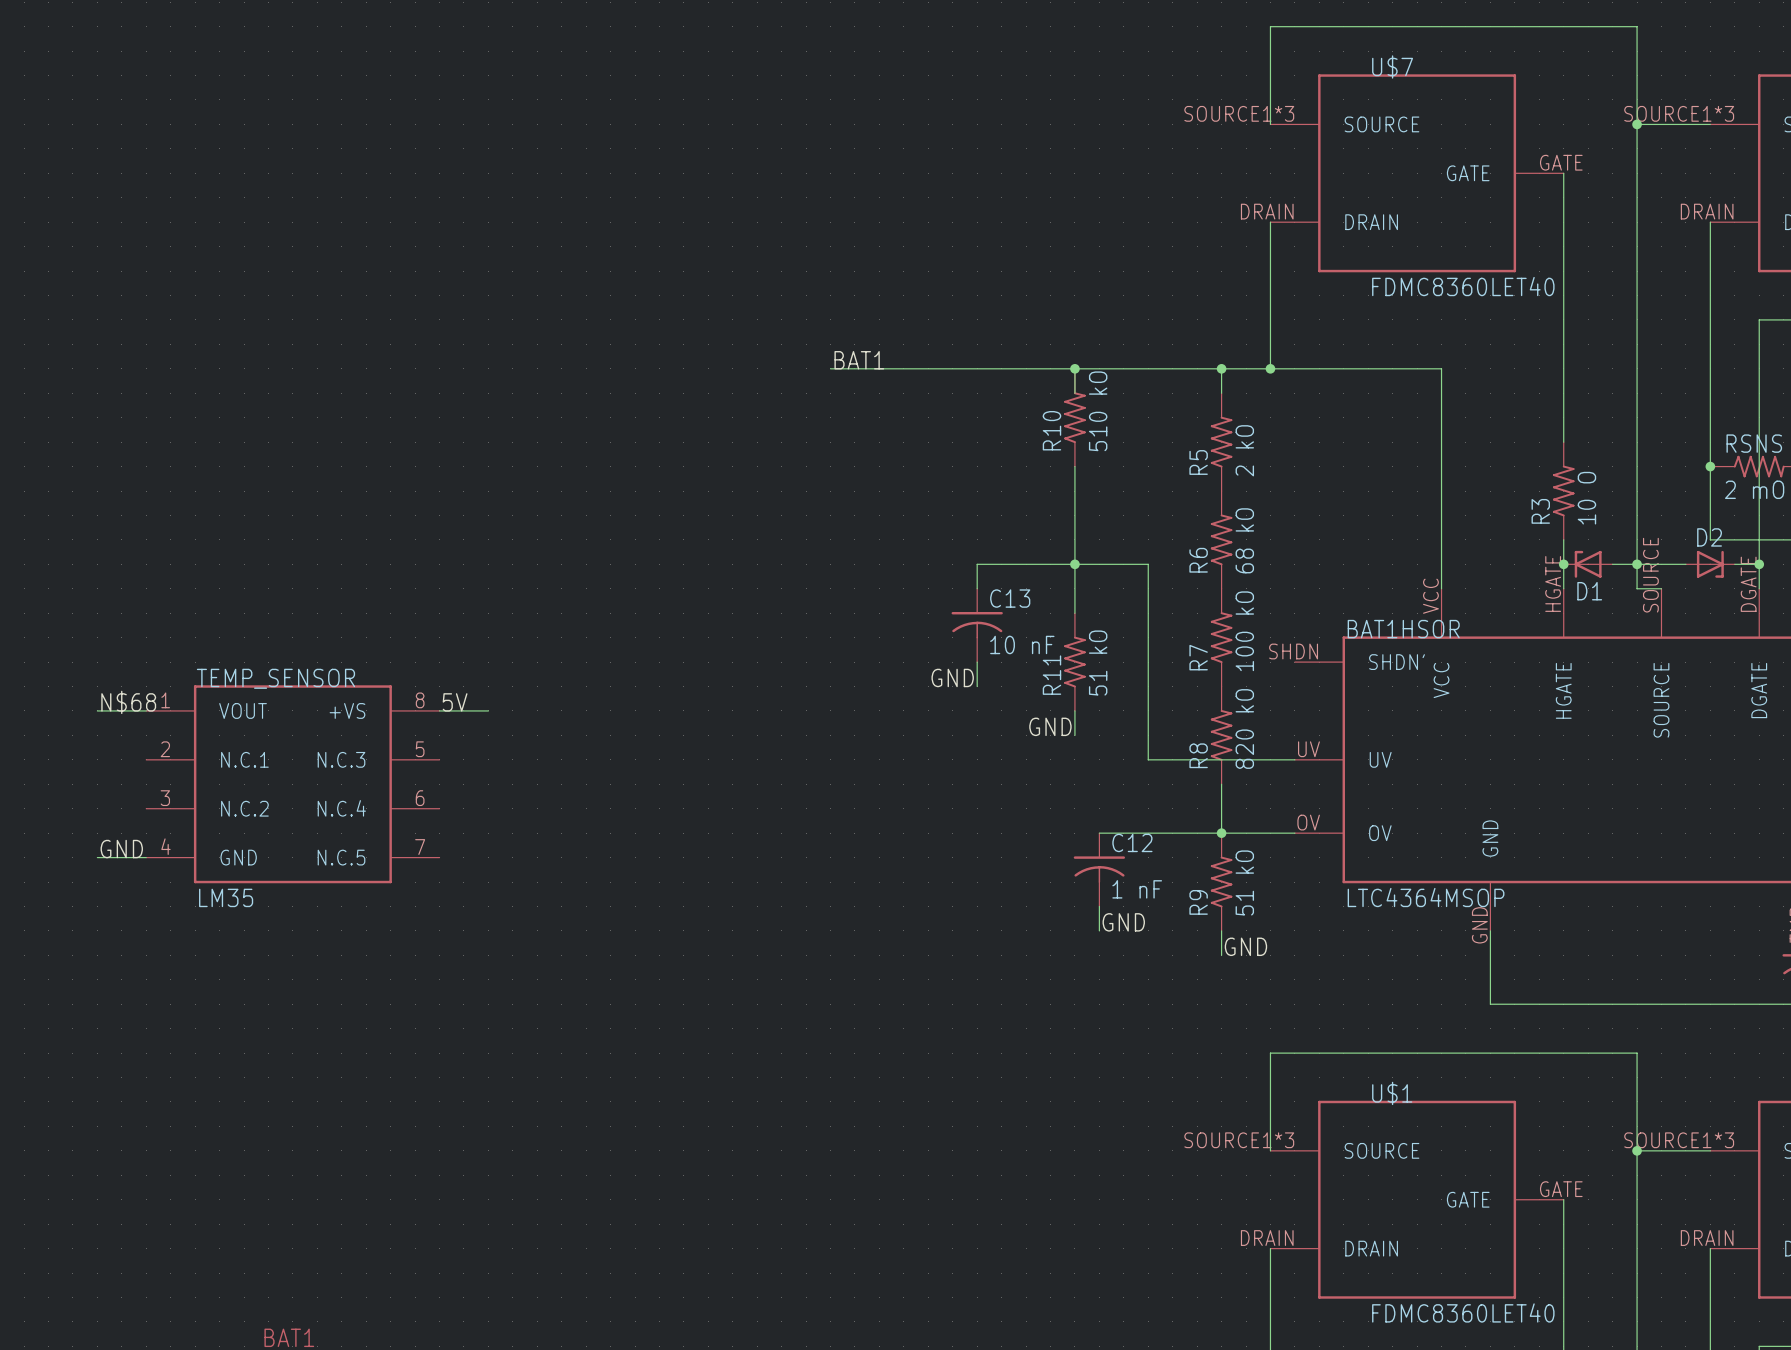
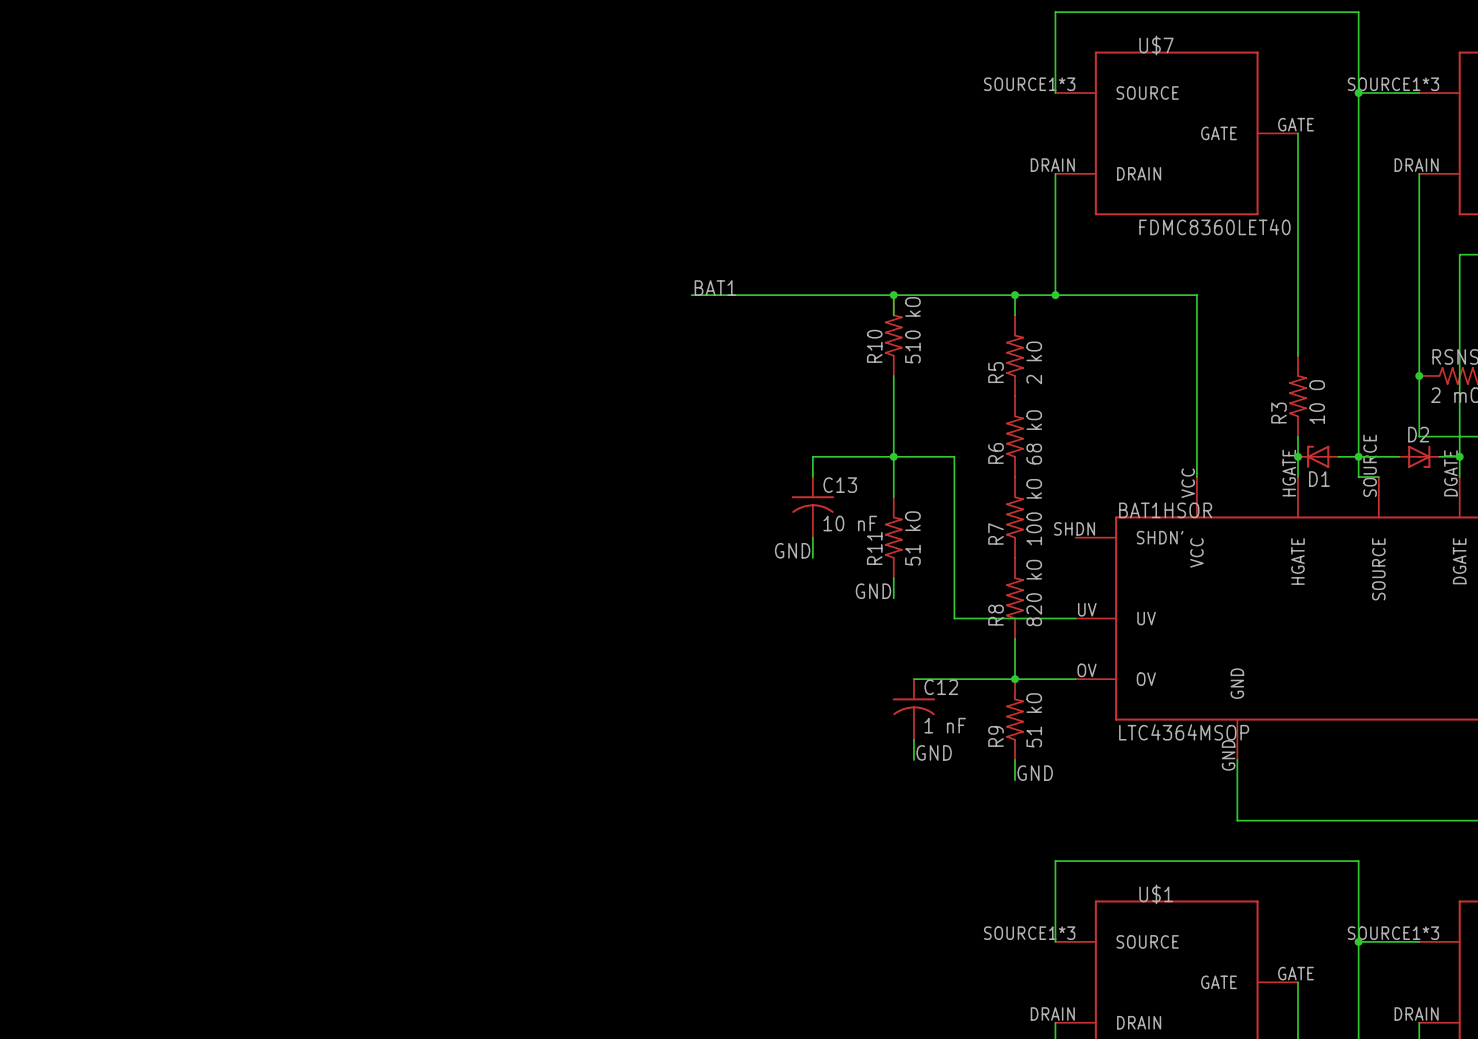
label: N$68 (128, 702) -> none
label: 5V (455, 702) -> none
wire: (97, 710) (146, 710) -> none
wire: (439, 710) (488, 710) -> none
TEMP_SENSOR: LM35 (292, 784) -> none
label: GND (121, 849) -> none
wire: (97, 857) (146, 857) -> none

